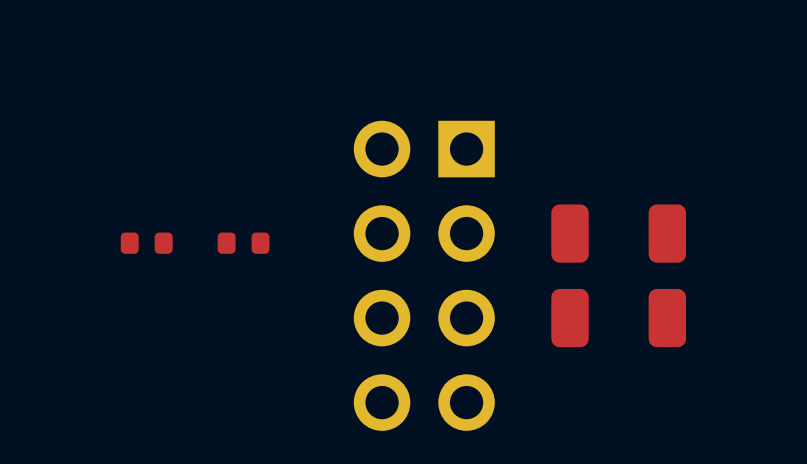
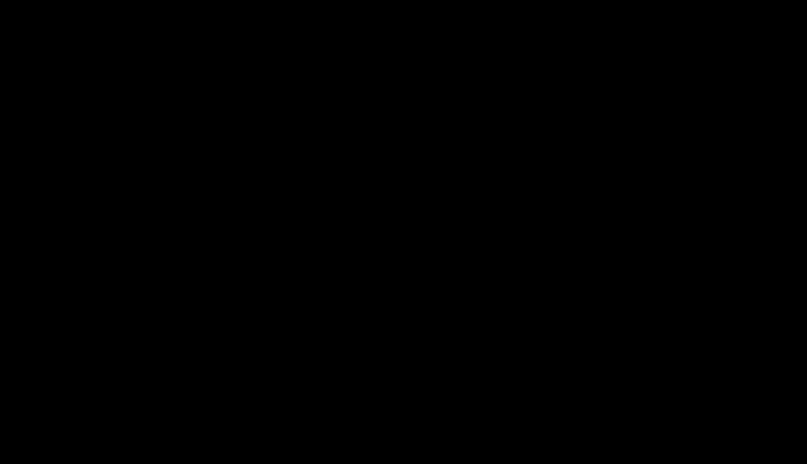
part: (618, 233) -> none
part: (146, 243) -> none
part: (243, 243) -> none
part: (424, 275) -> none
part: (618, 318) -> none

